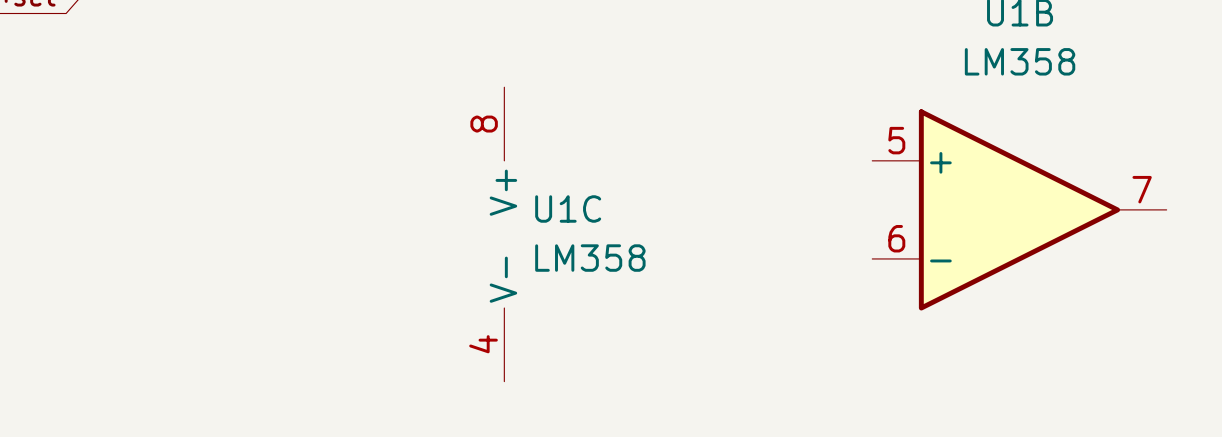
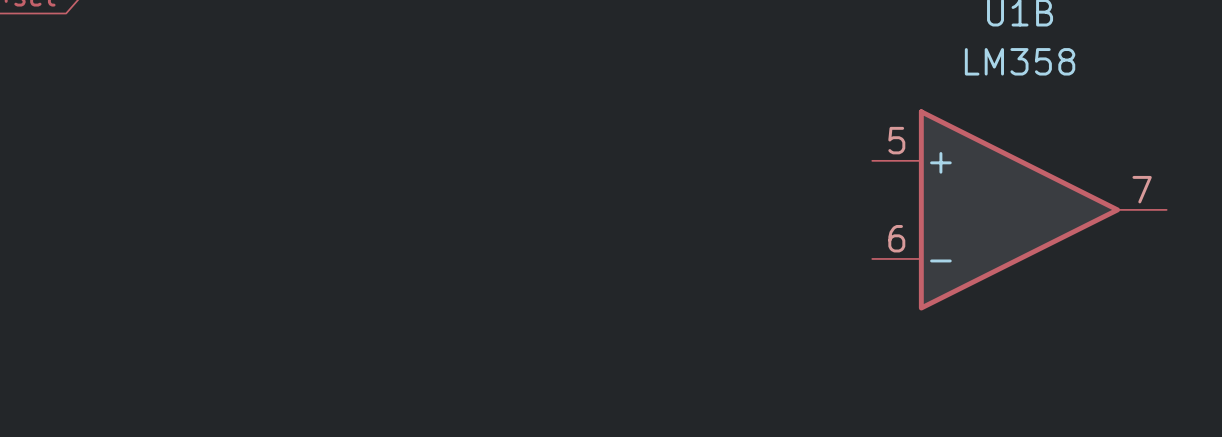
U1C: LM358 (504, 234) -> none

